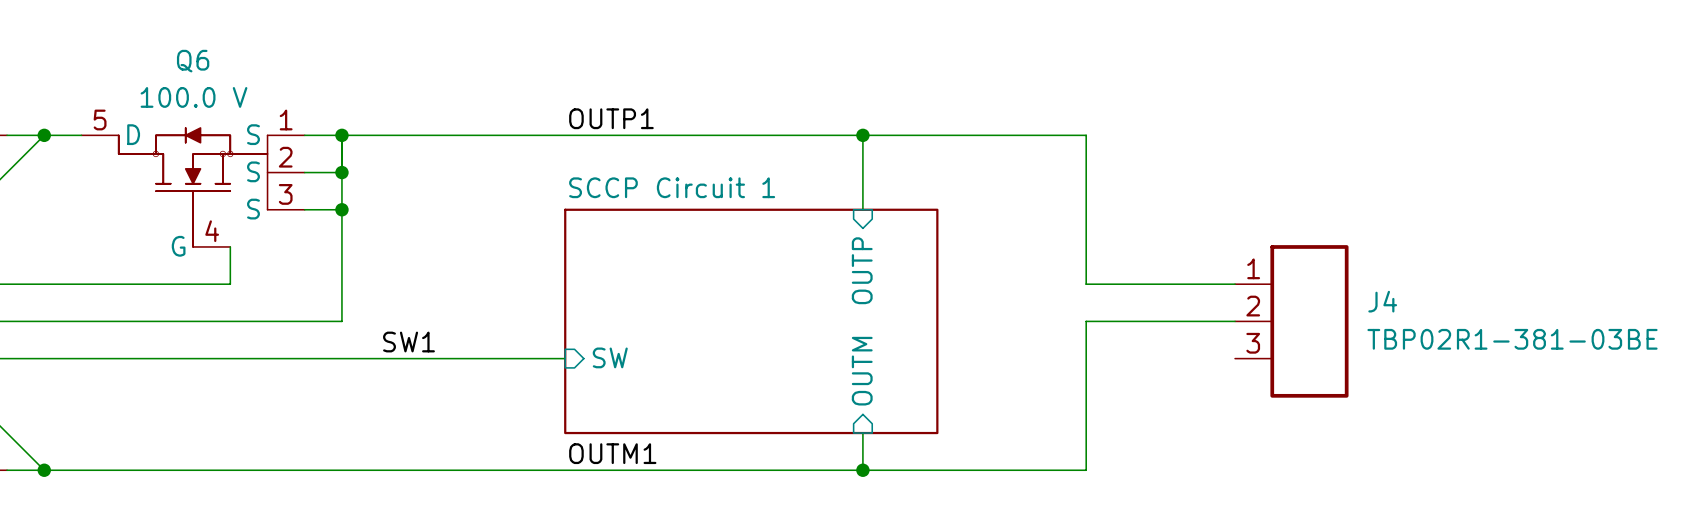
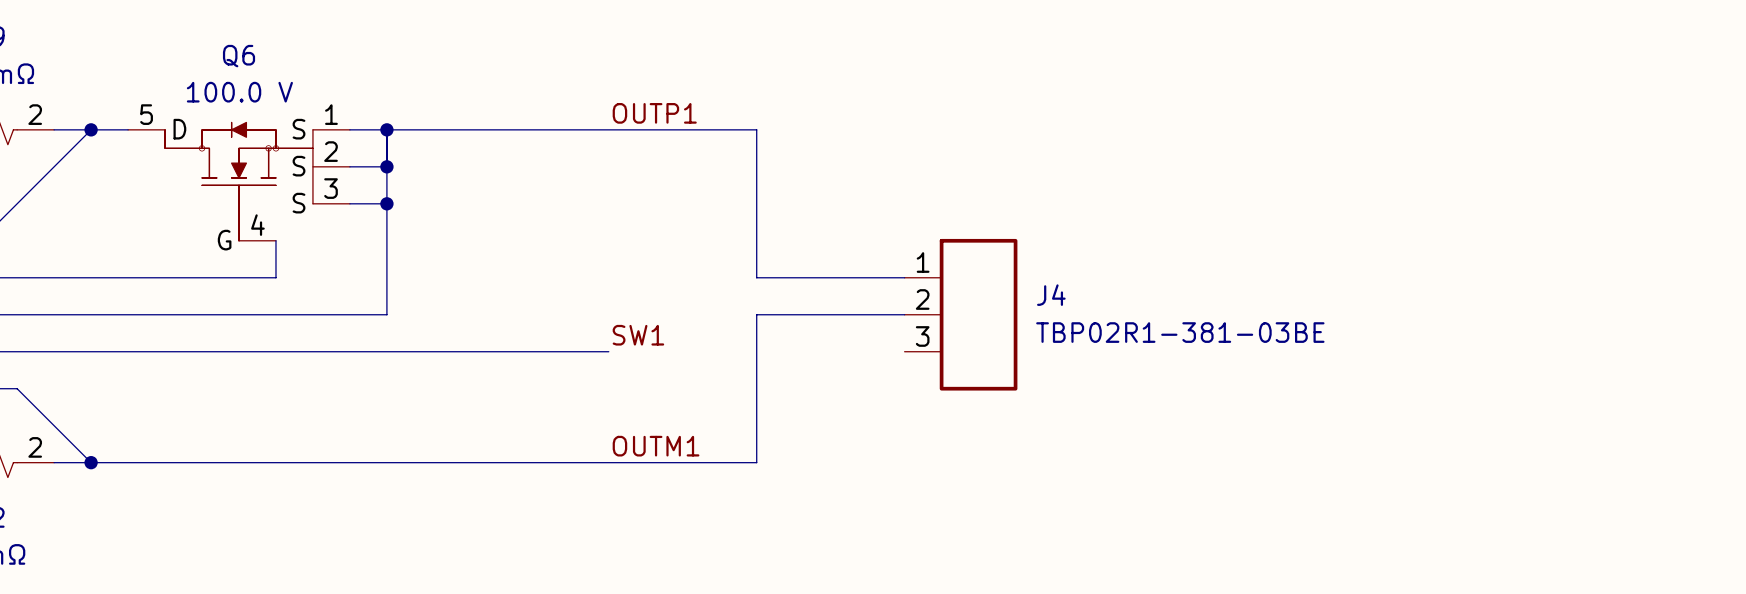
wire: (714, 135) (1086, 135) (1086, 284) (1235, 284) -> (756, 129) (756, 277) (904, 277)
wire: (862, 135) (862, 209) -> none
junction: (862, 135) -> none
sheet pin: OUTP (862, 270) -> none
sheet SCCP Circuit 1: (751, 321) -> none
wire: (1235, 321) (1086, 321) (1086, 470) (714, 470) -> (904, 314) (756, 314) (756, 462)
J4 position: (1291, 321) -> (961, 314)
label position: SW1 (408, 342) -> SW1 (638, 335)
sheet pin: SW (610, 357) -> none
sheet pin: OUTM (862, 371) -> none
wire: (862, 433) (862, 470) -> none
junction: (862, 470) -> none

